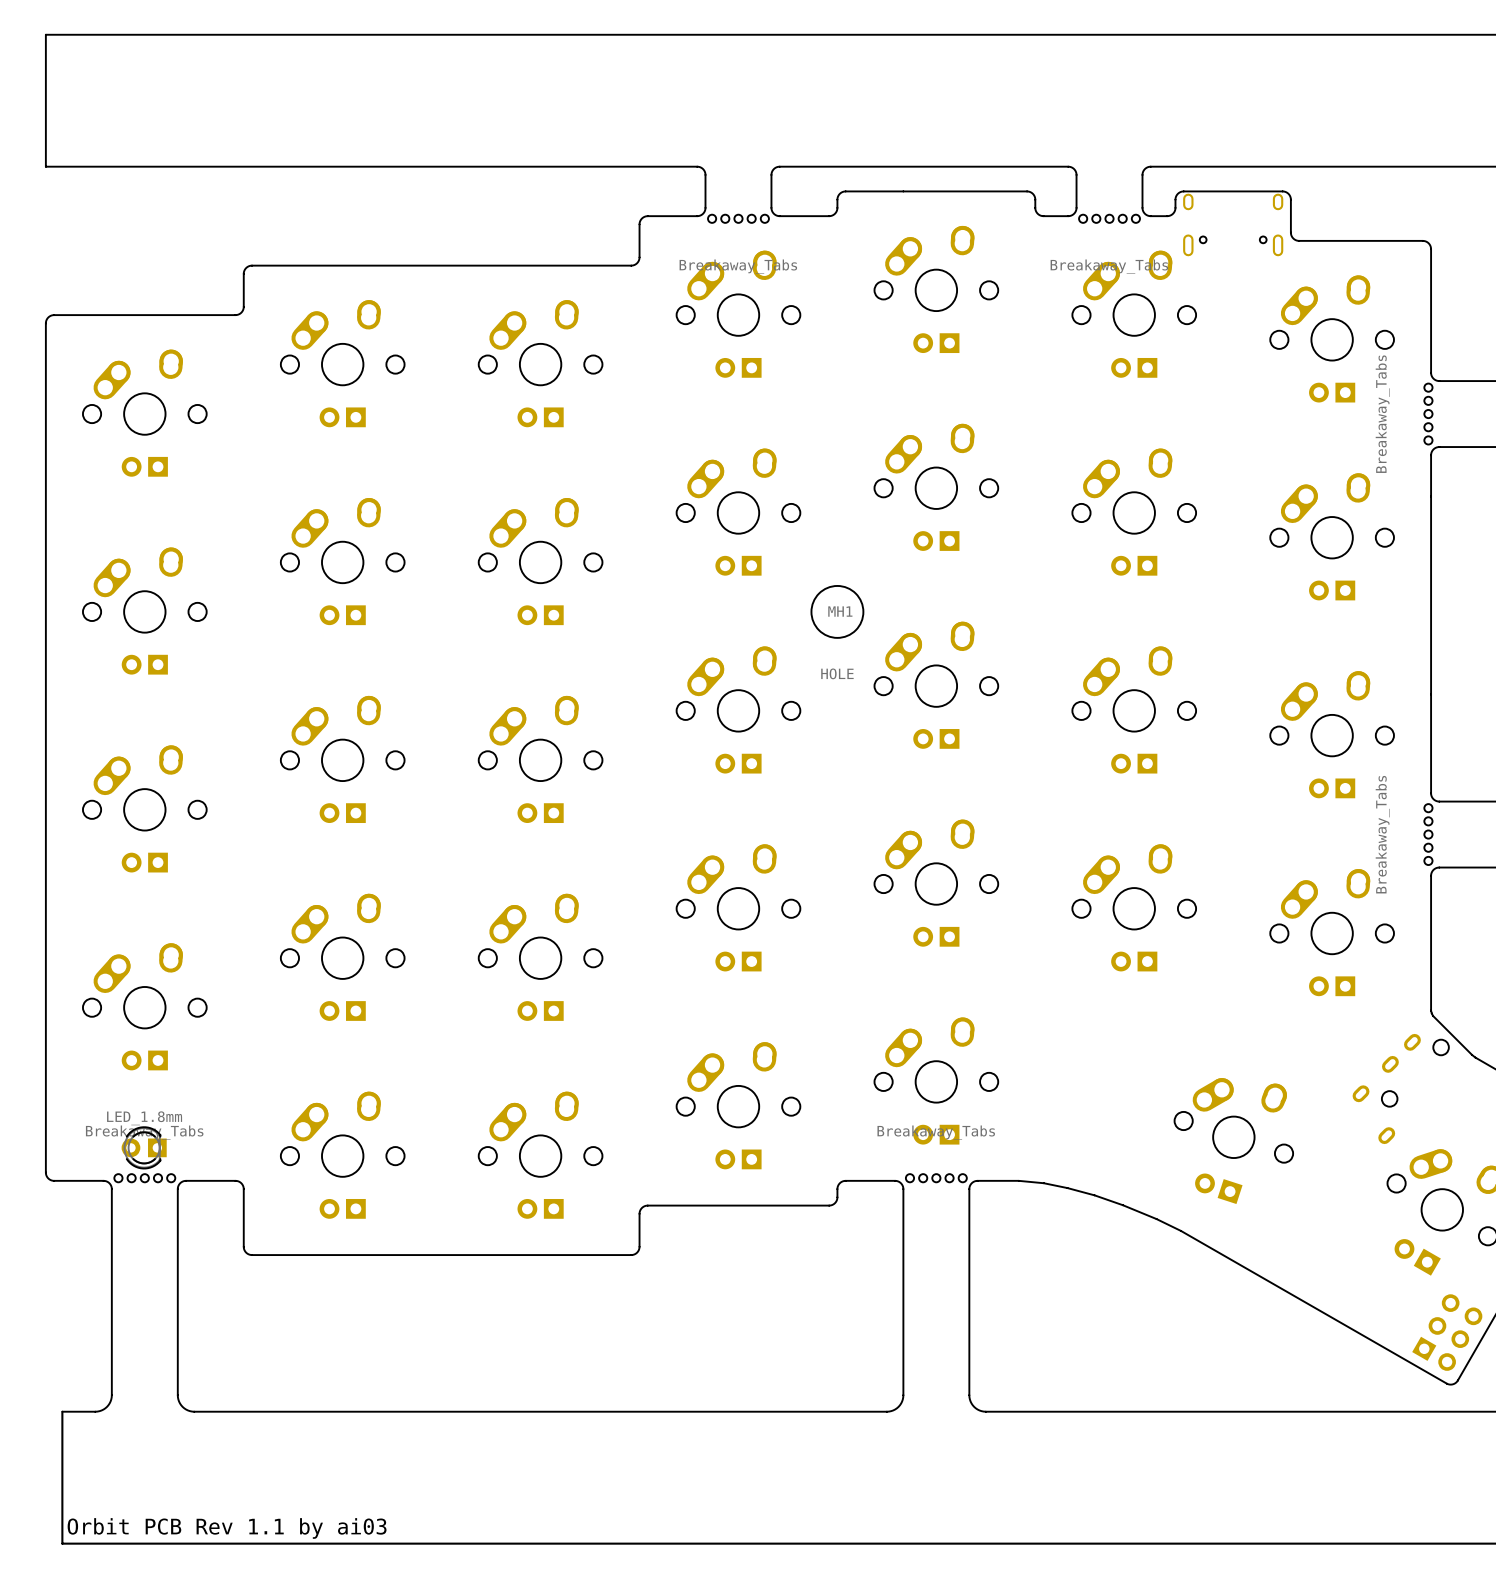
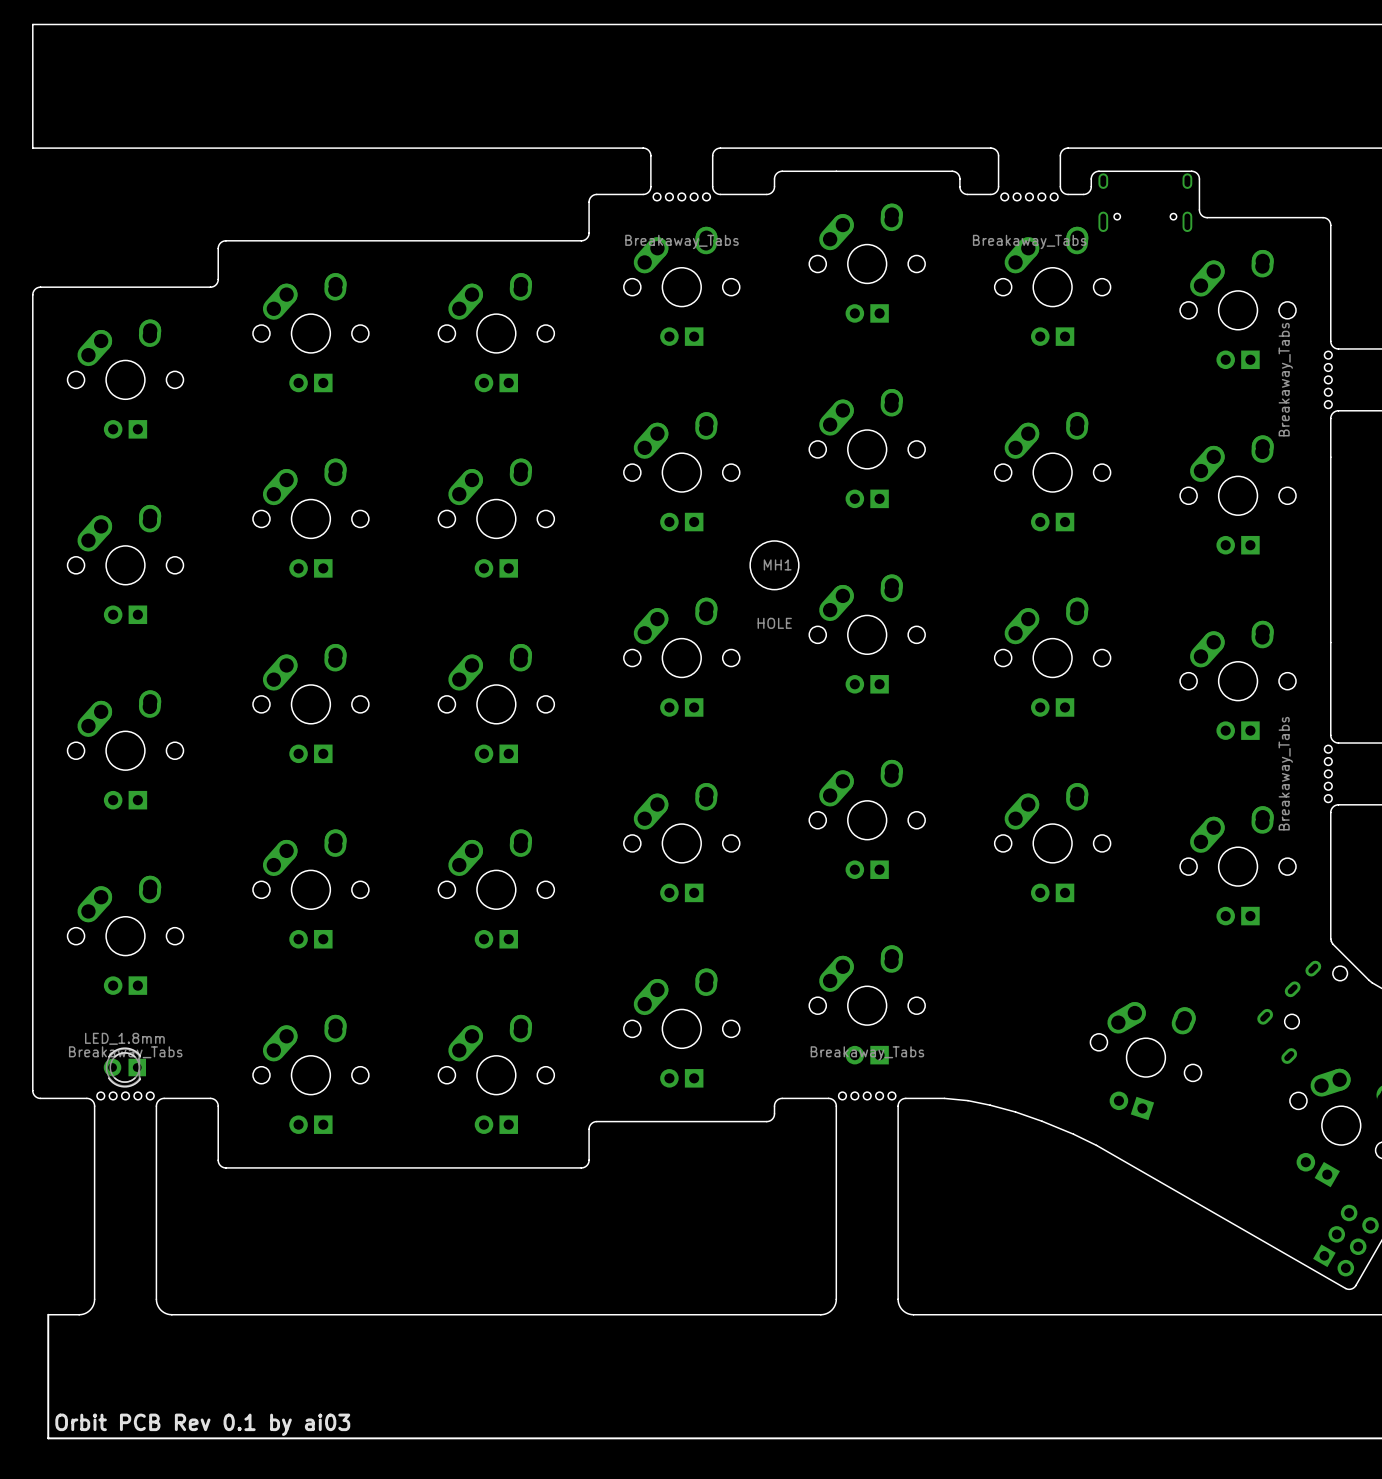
text: Orbit PCB Rev 1.1 by ai03 (227, 1528) -> Orbit PCB Rev 0.1 by ai03 (202, 1424)

